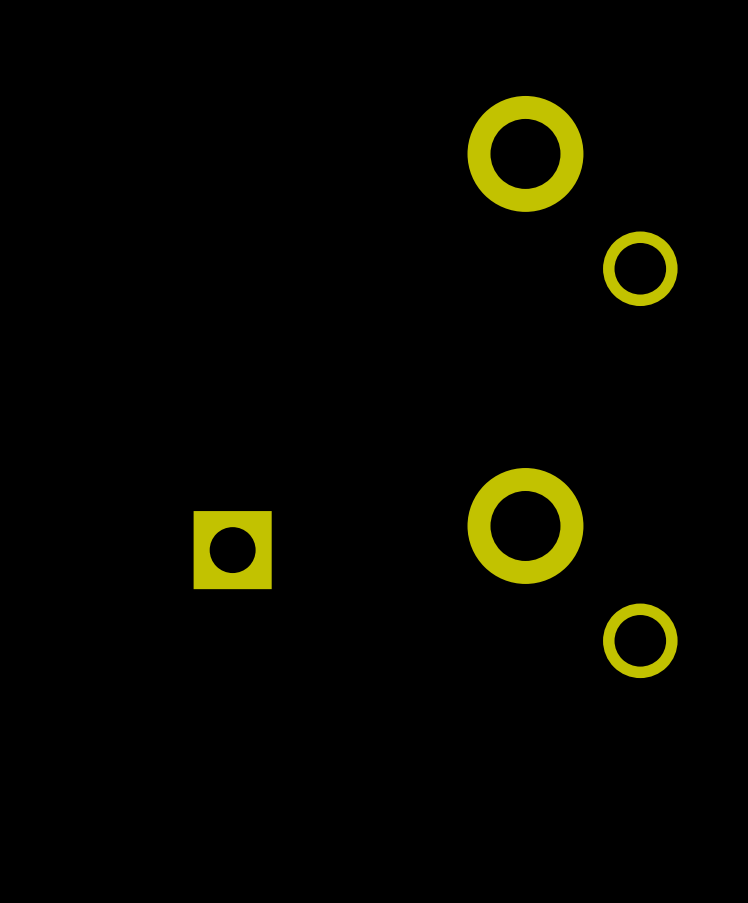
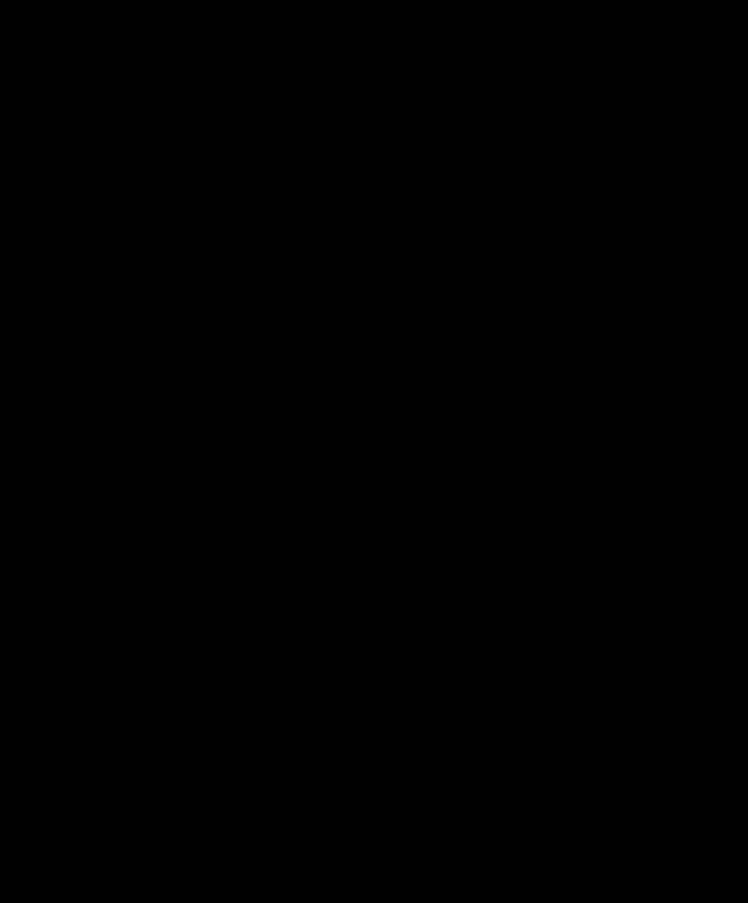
part: (572, 201) -> none
part: (232, 550) -> none
part: (572, 573) -> none

